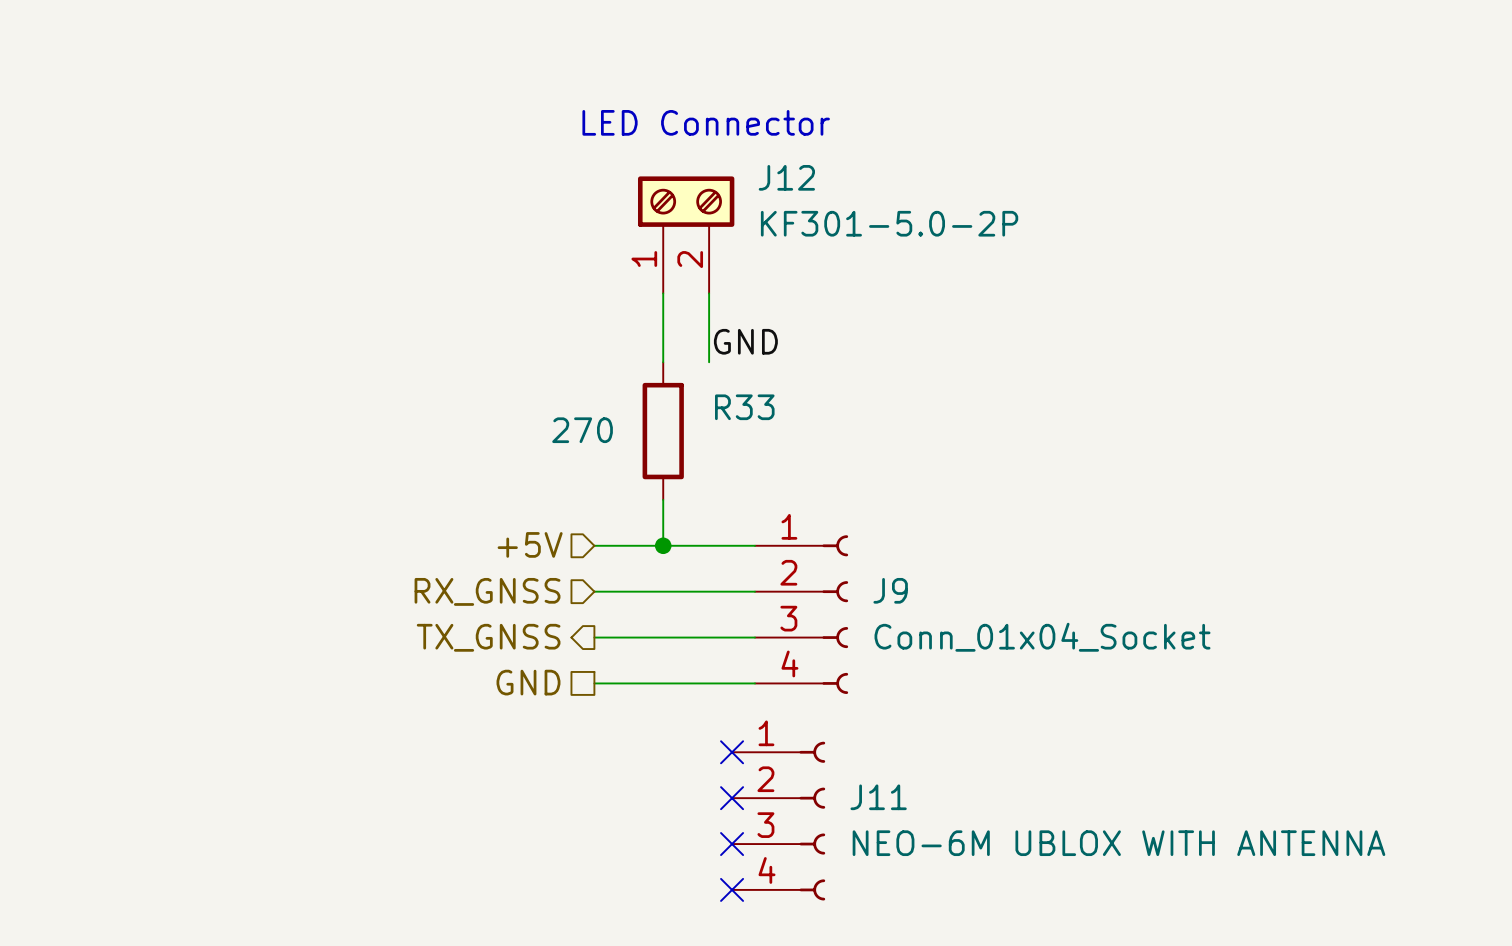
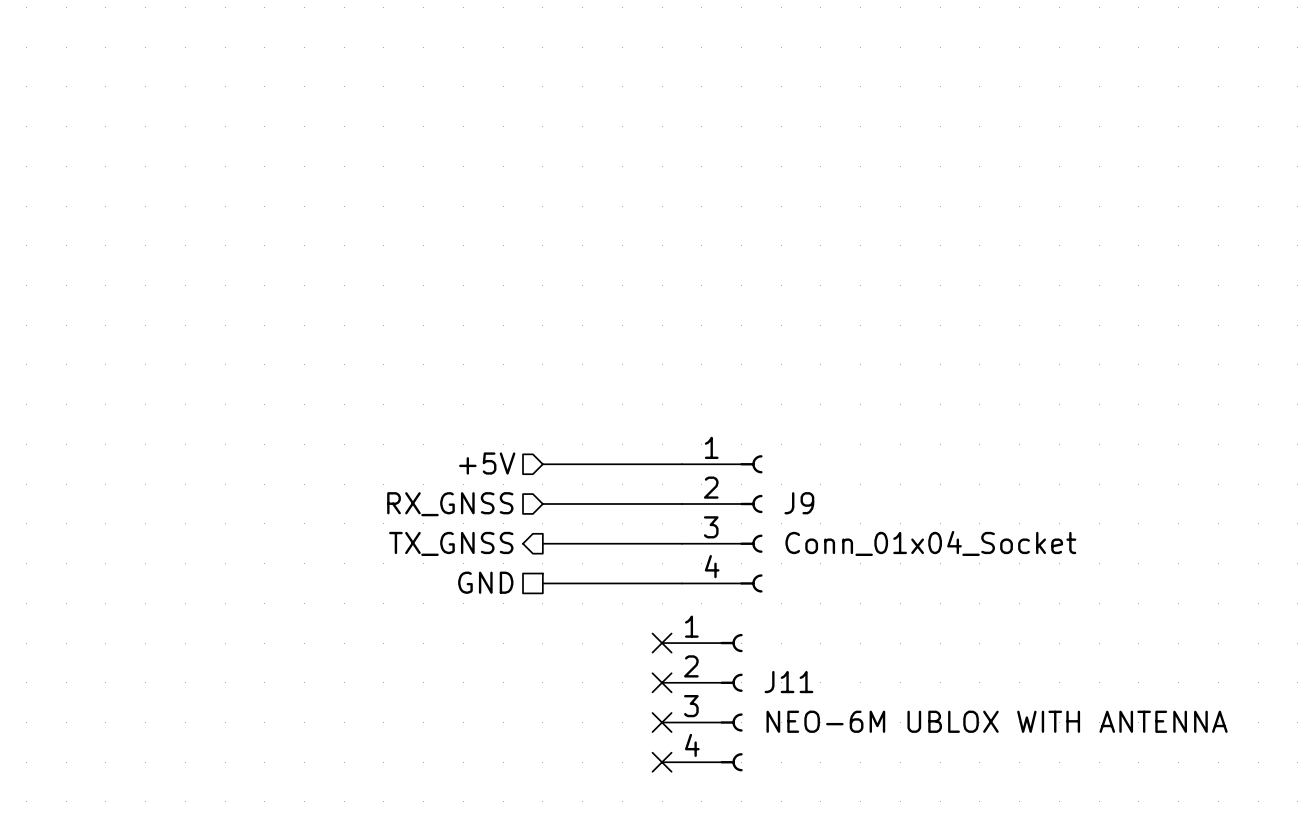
text: LED Connector (706, 122) -> none
J12: KF301-5.0-2P (686, 234) -> none
wire: (663, 293) (663, 362) -> none
wire: (709, 293) (709, 362) -> none
label: GND (745, 341) -> none
R33: 270 (663, 431) -> none
wire: (663, 499) (663, 545) -> none
junction: (663, 545) -> none

